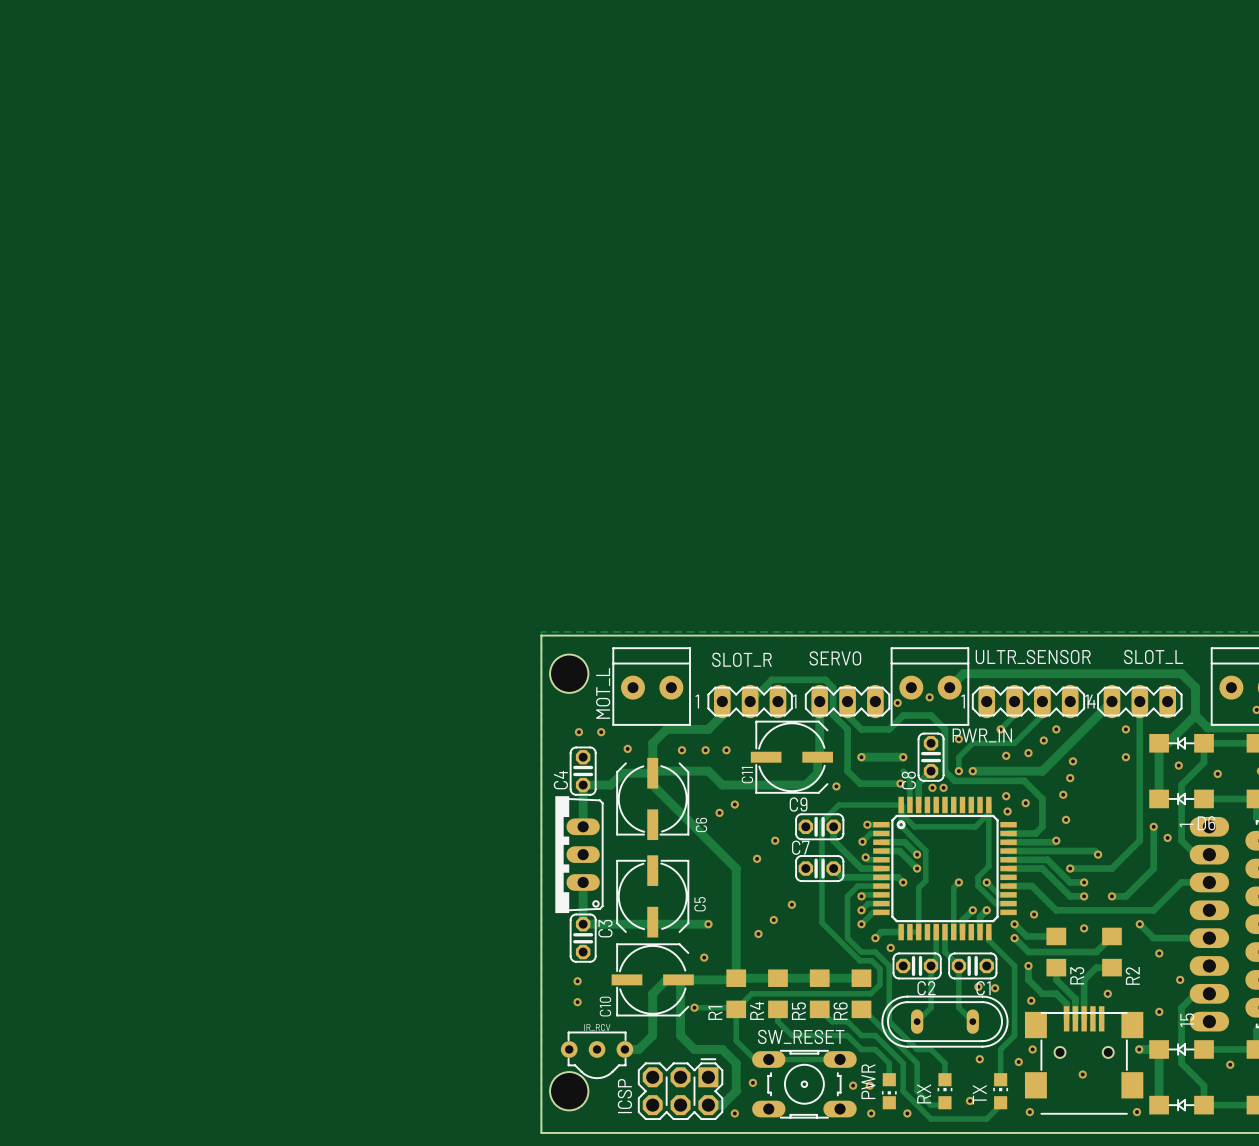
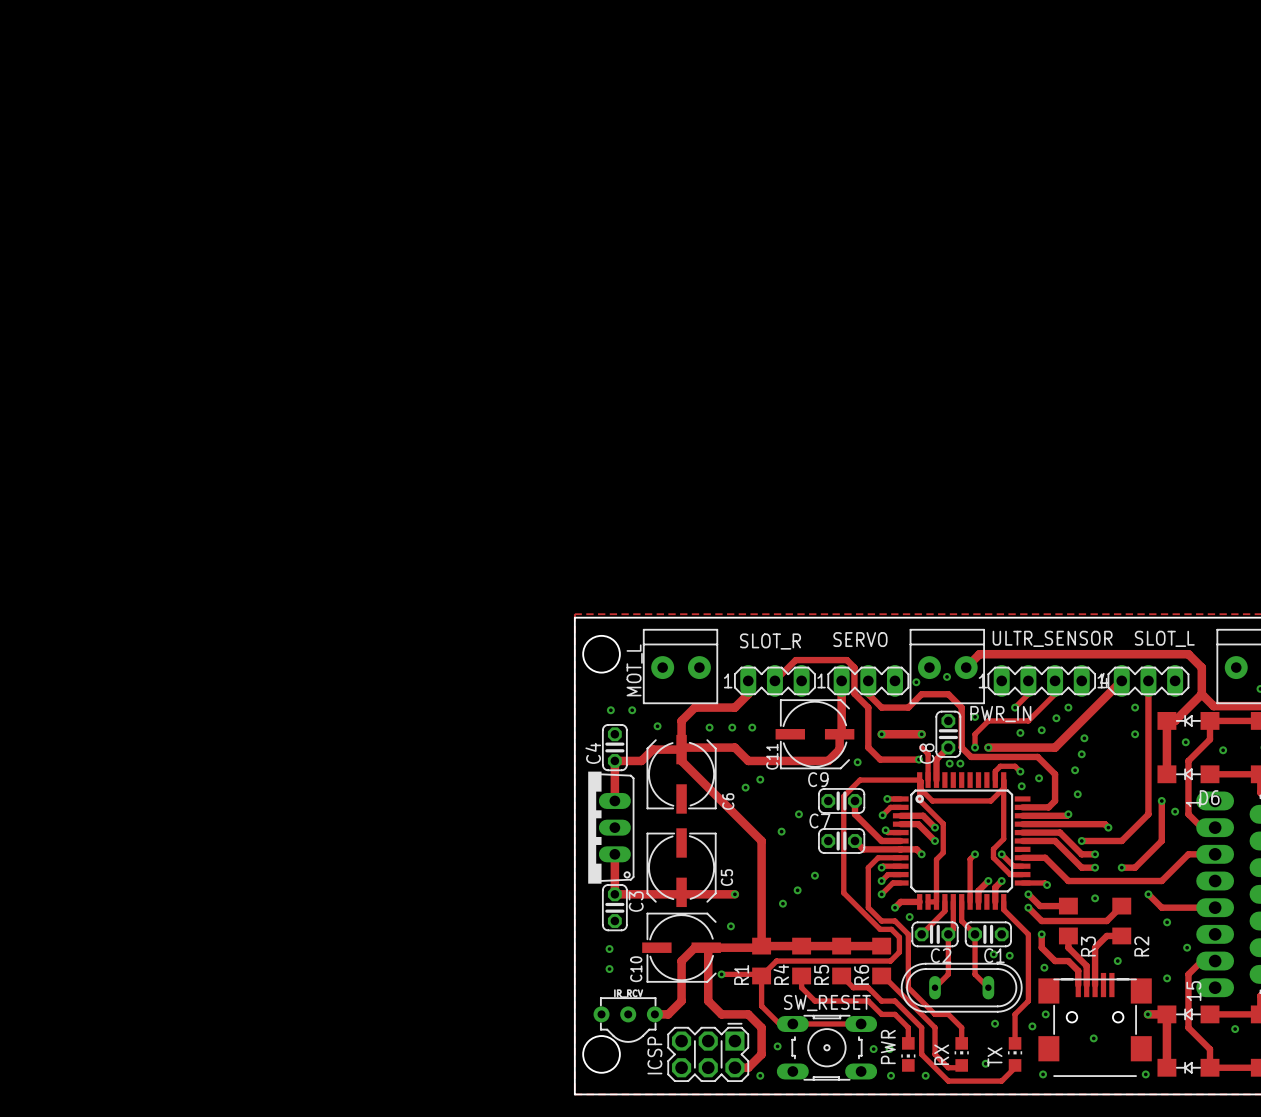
track: none -> (1020, 771) (1015, 766) (1000, 766) (995, 771) (995, 780)
track: none -> (1022, 882) (1045, 882) (1047, 885)
track: none -> (944, 901) (944, 911) (921, 934)

